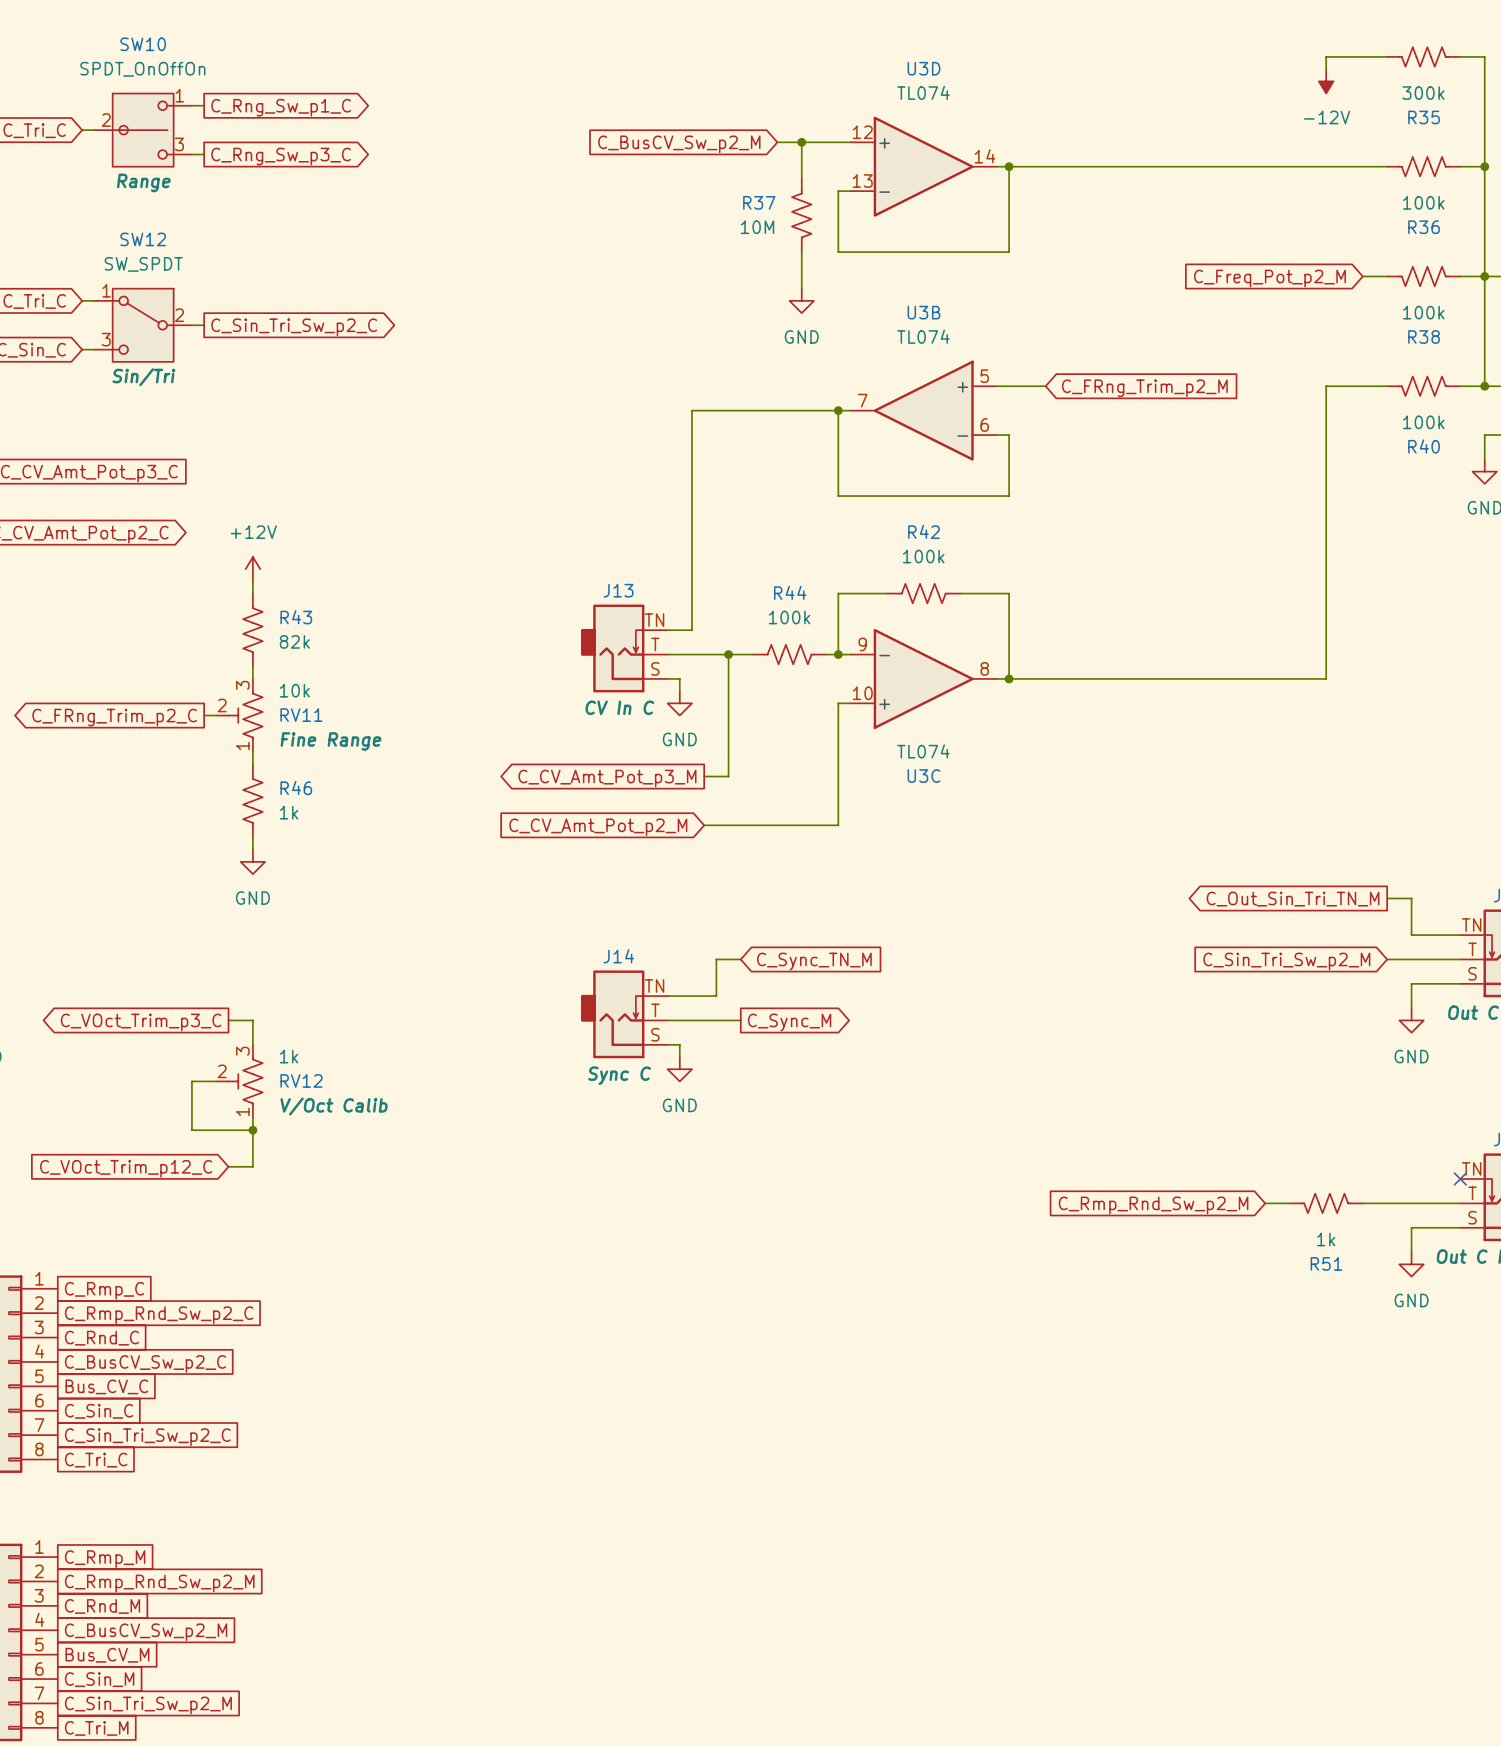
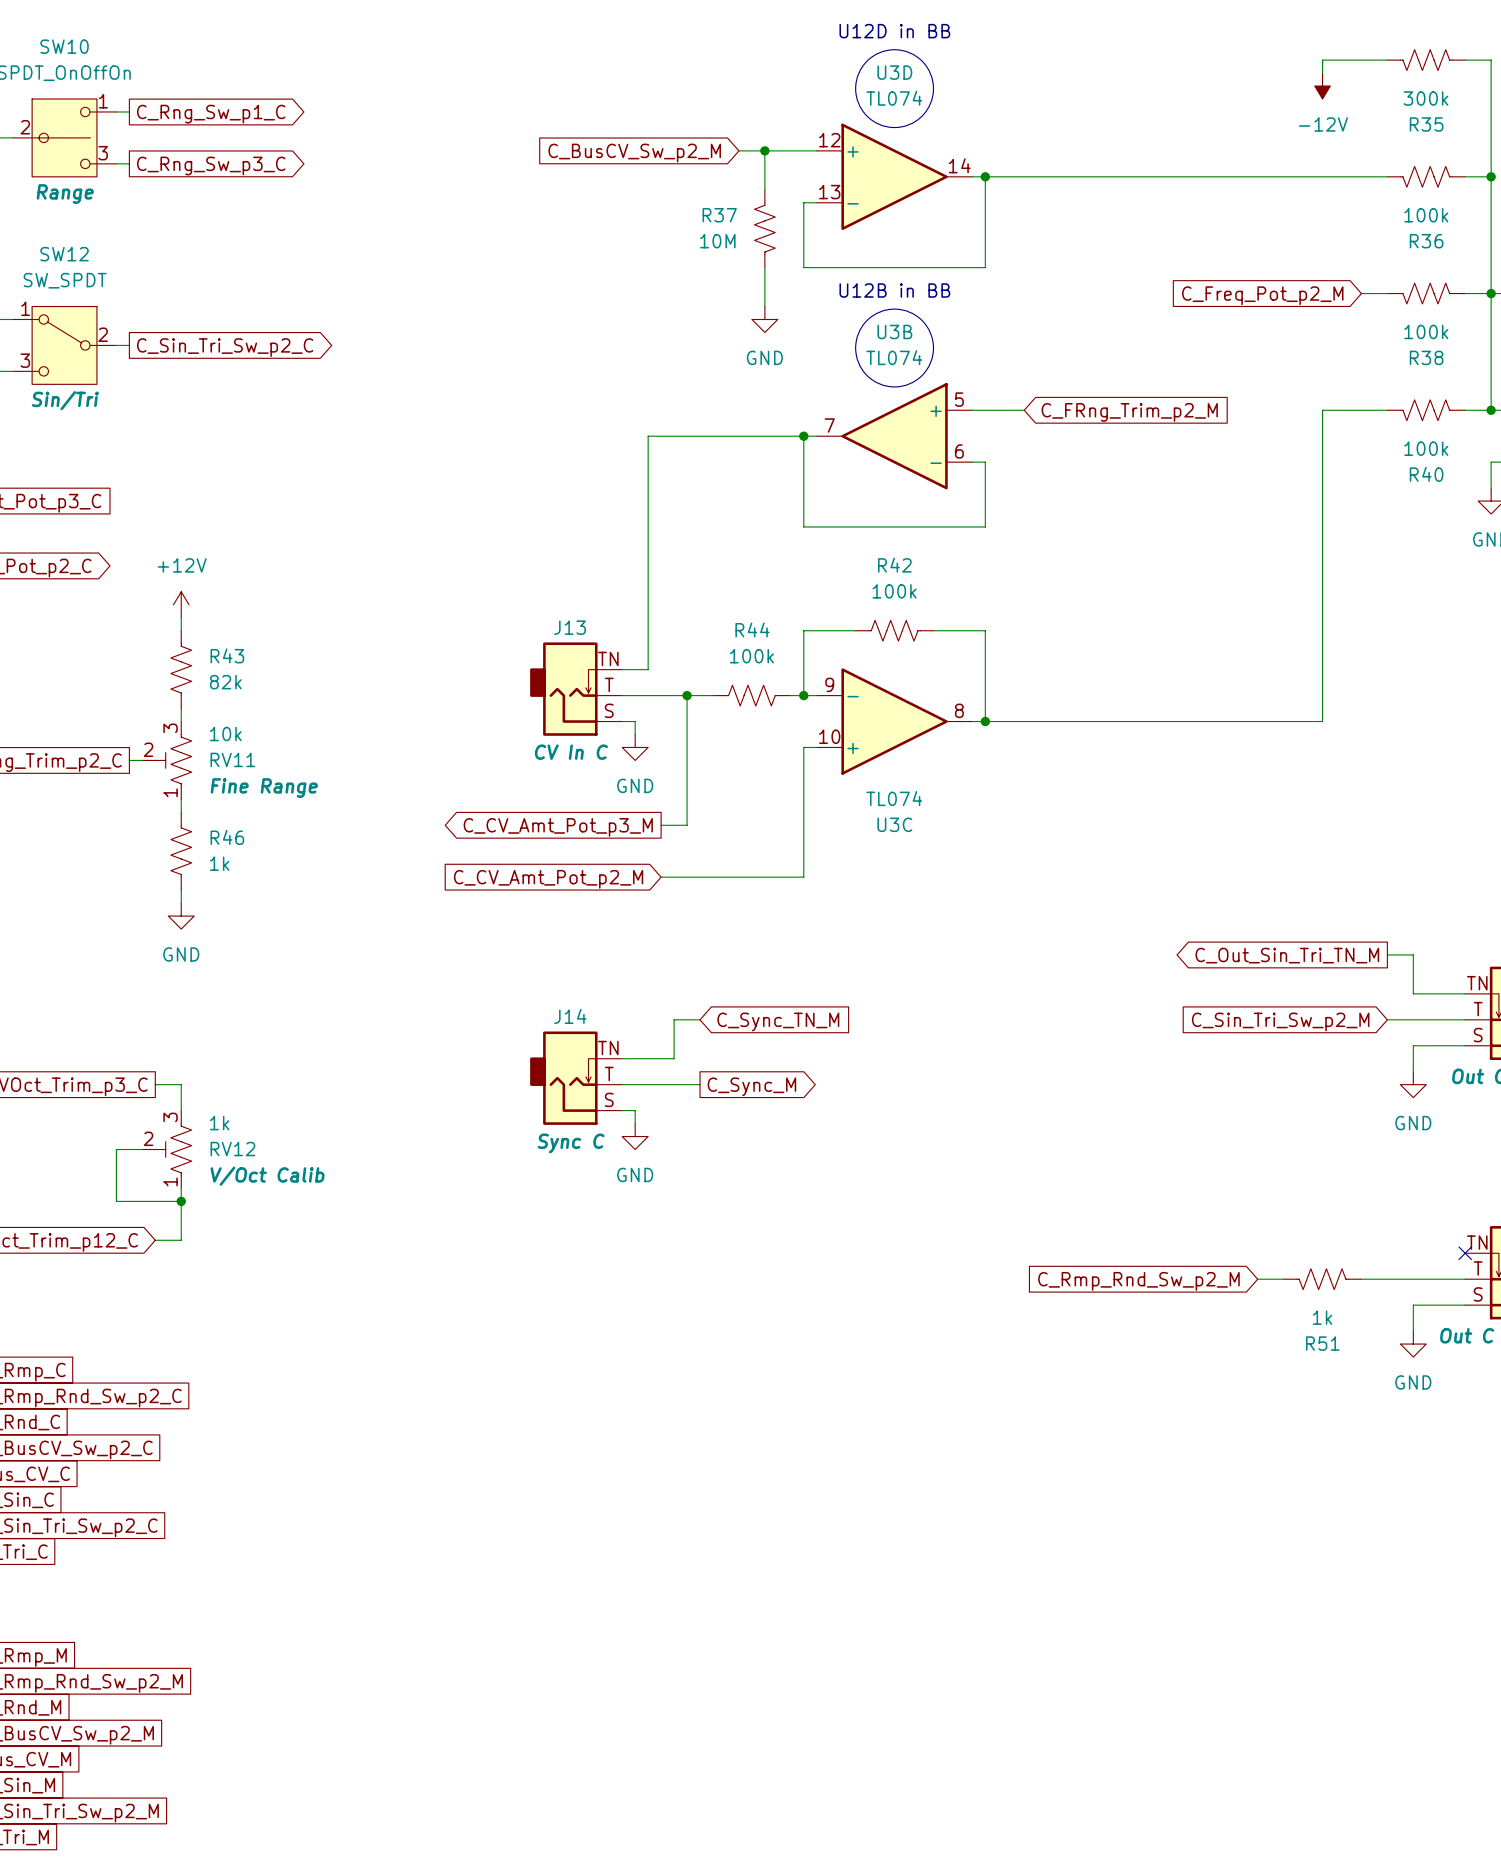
text: none -> U12D in BB (894, 31)
drawing: none -> [855, 49, 934, 128]
text: none -> U12B in BB (894, 290)
drawing: none -> [855, 309, 934, 387]

